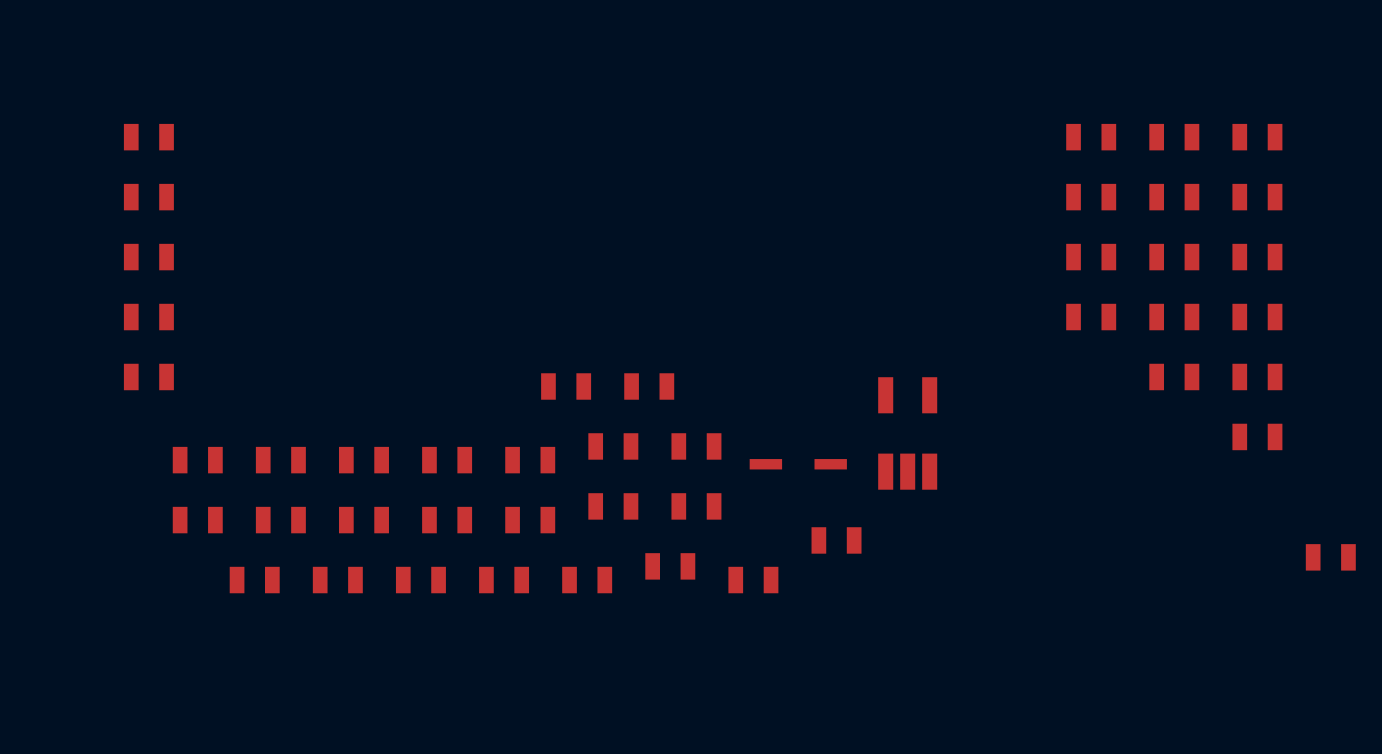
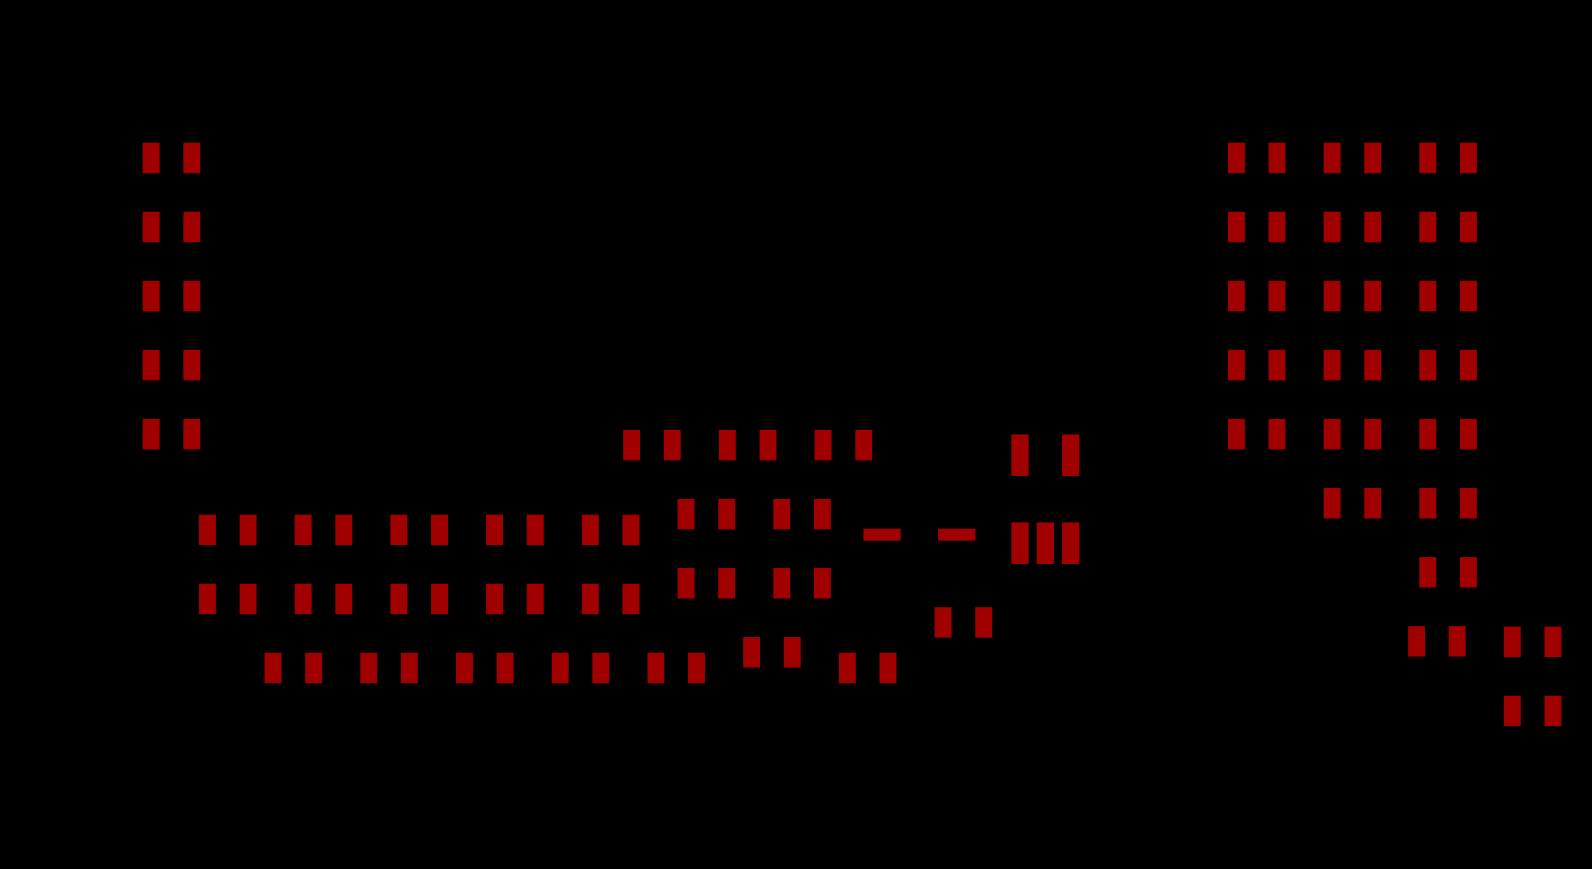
part: none -> (1256, 434)
part: none -> (843, 445)
part: none -> (1352, 503)
part: none -> (1448, 572)
part: none -> (1436, 641)
part: none -> (1532, 710)

